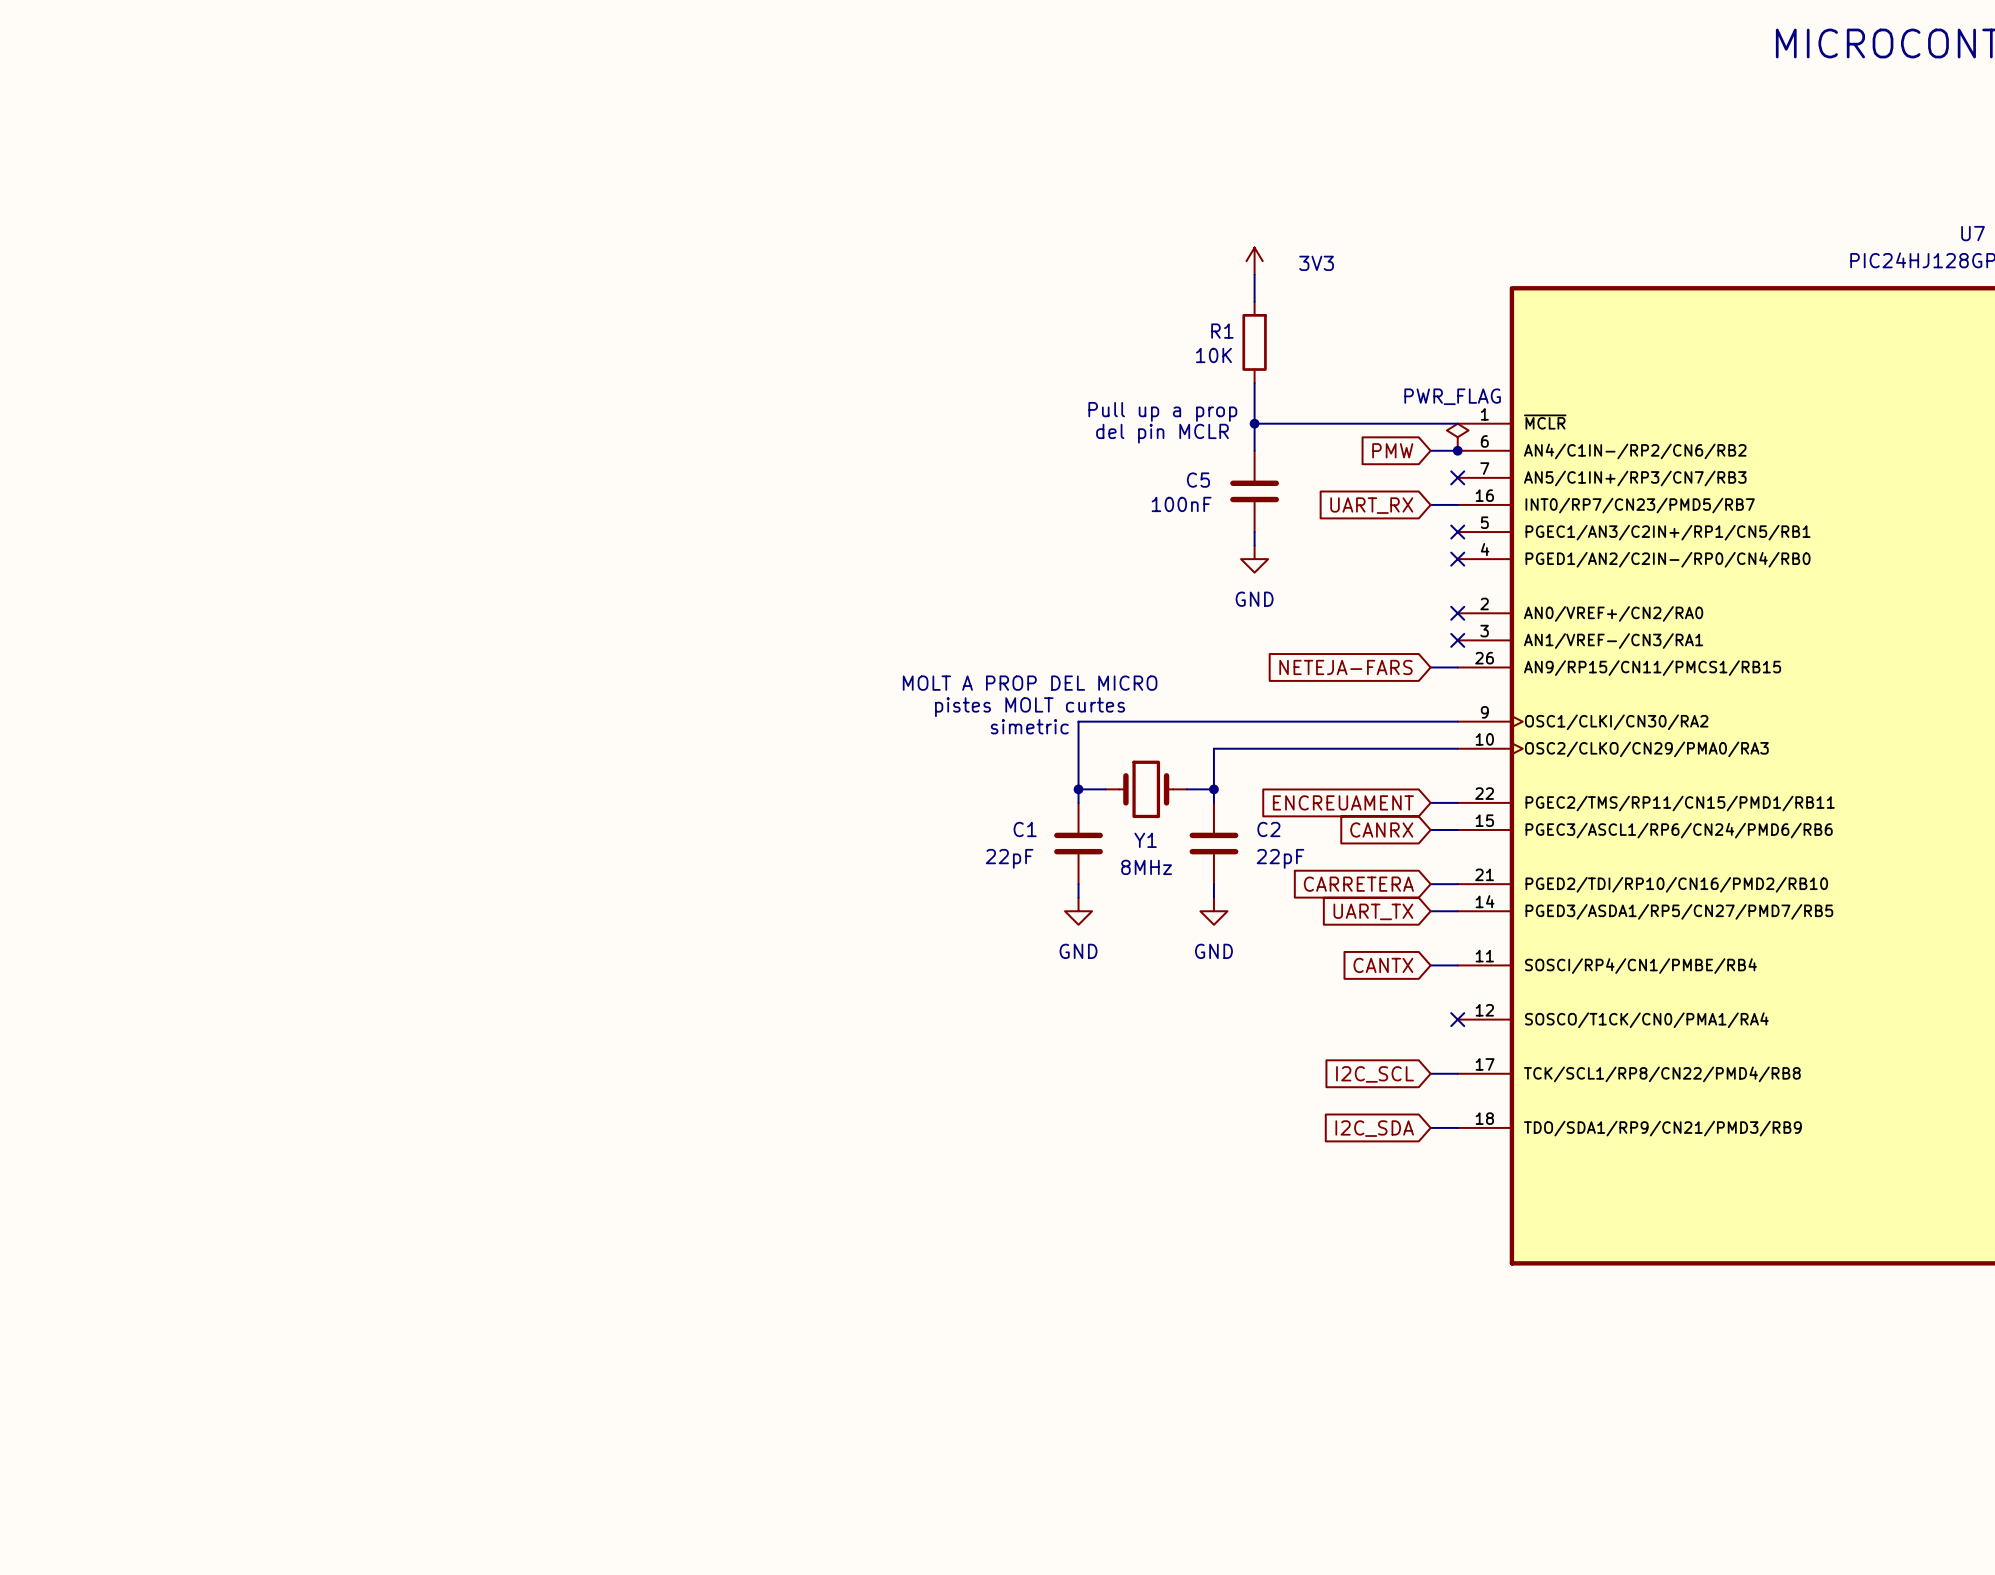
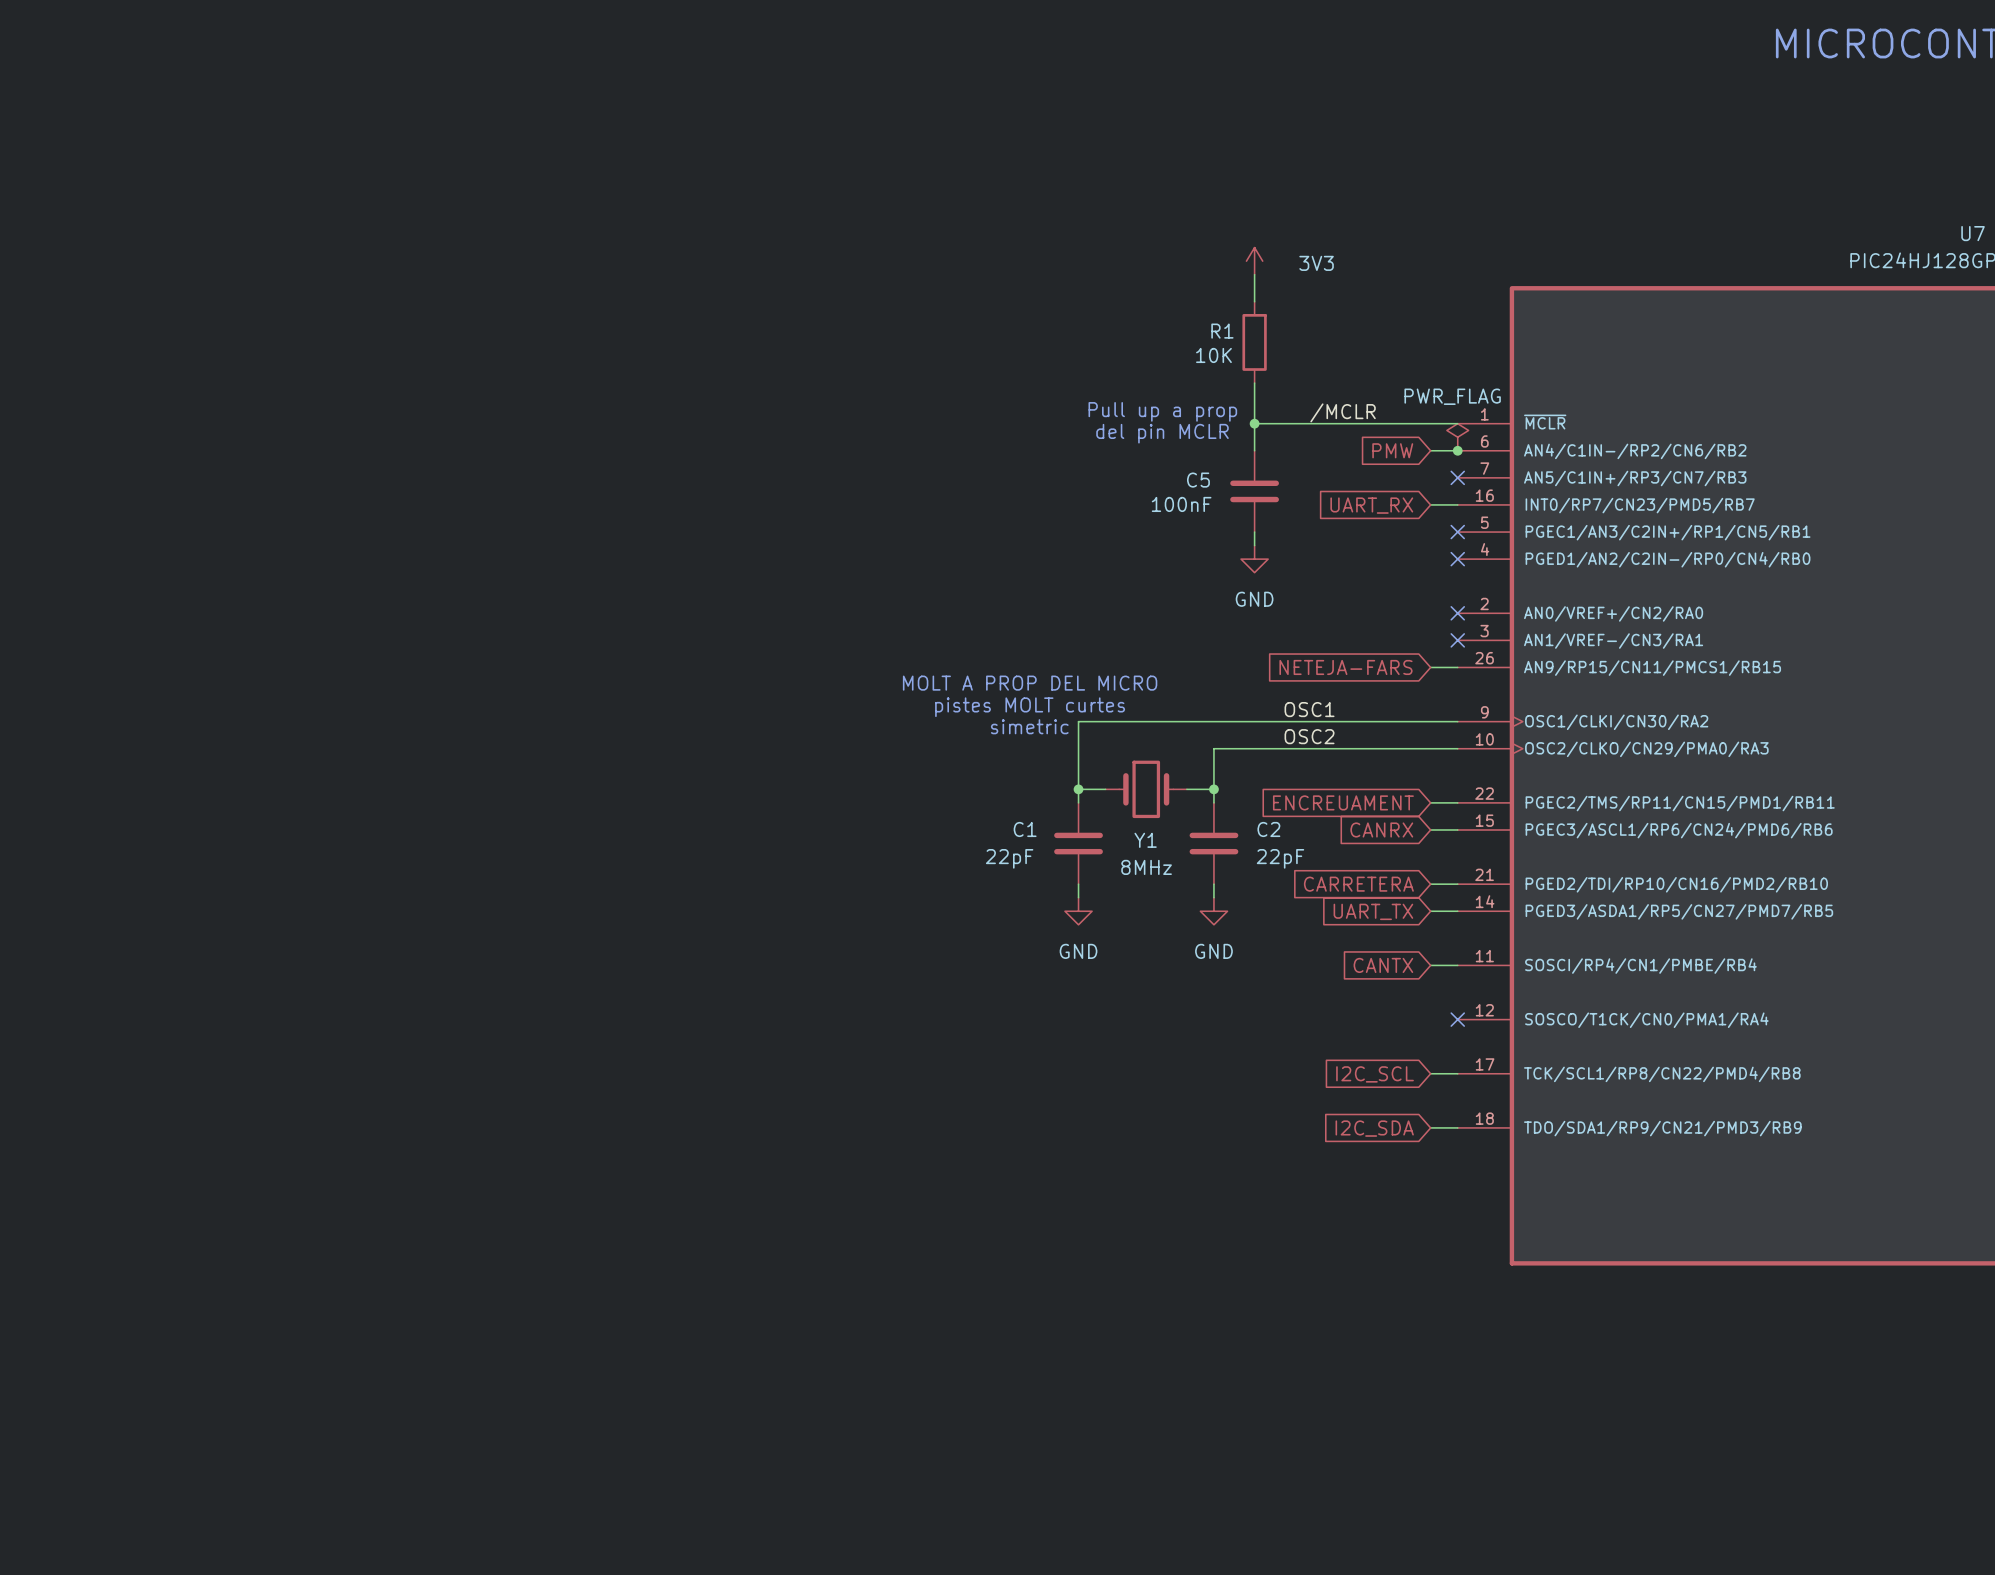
label: none -> /MCLR (1343, 412)
label: none -> OSC1 (1309, 709)
label: none -> OSC2 (1309, 736)

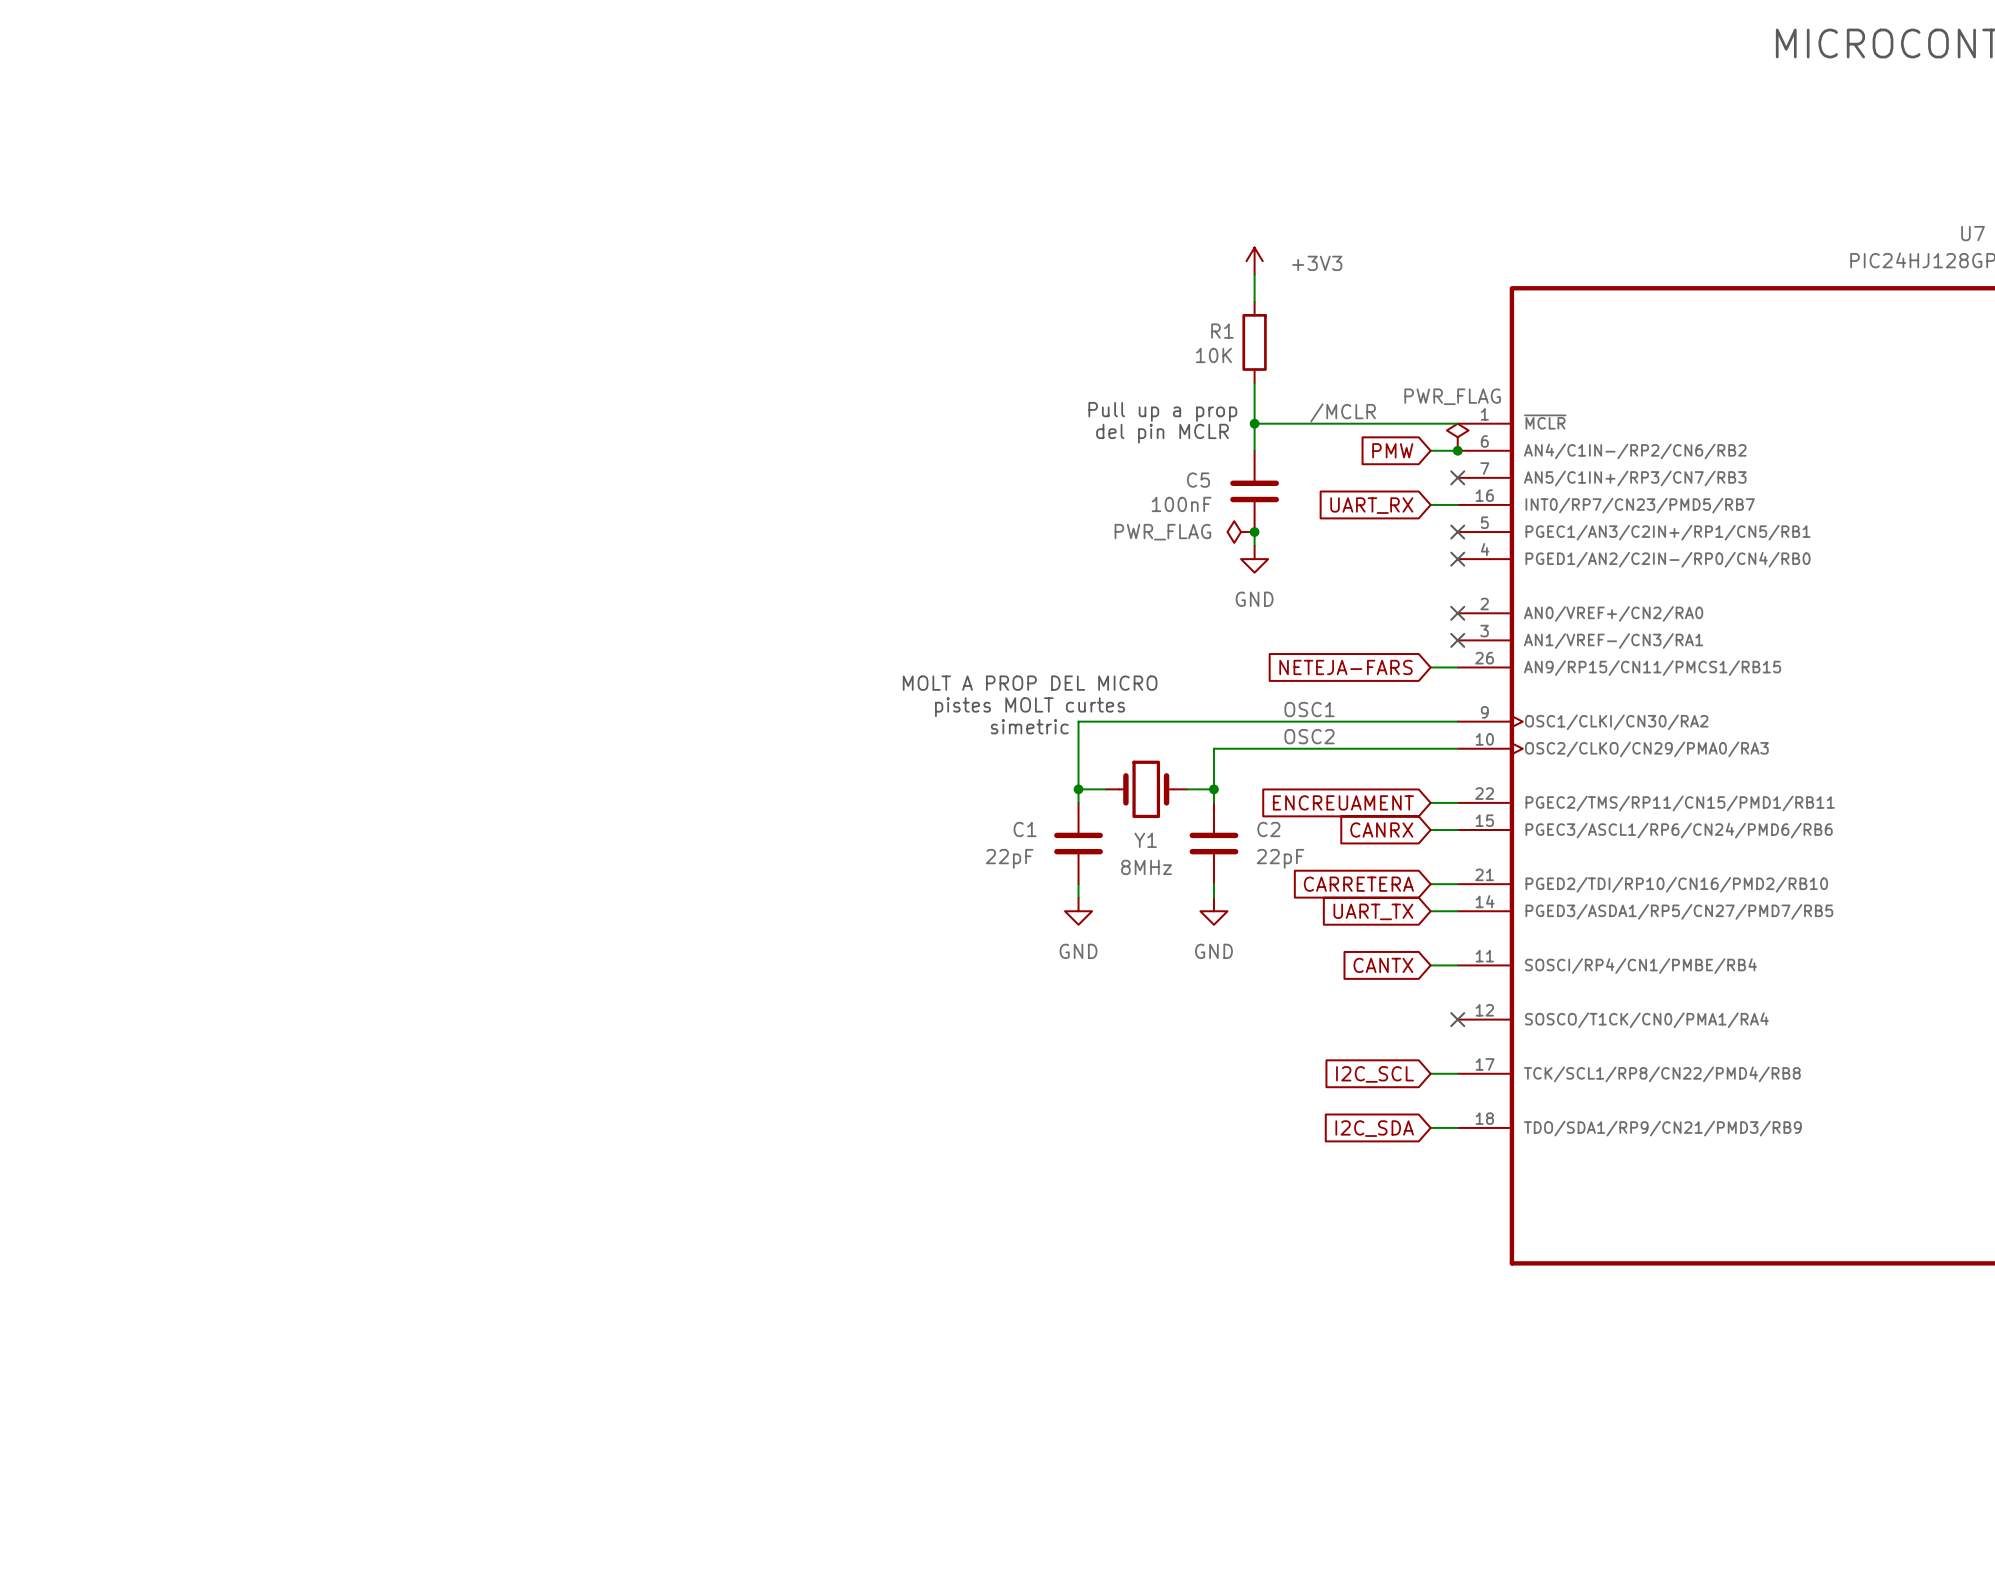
power symbol: 3V3 (1254, 261) -> +3V3 (1254, 261)
power symbol: none -> PWR_FLAG (1241, 532)
junction: none -> (1254, 532)

